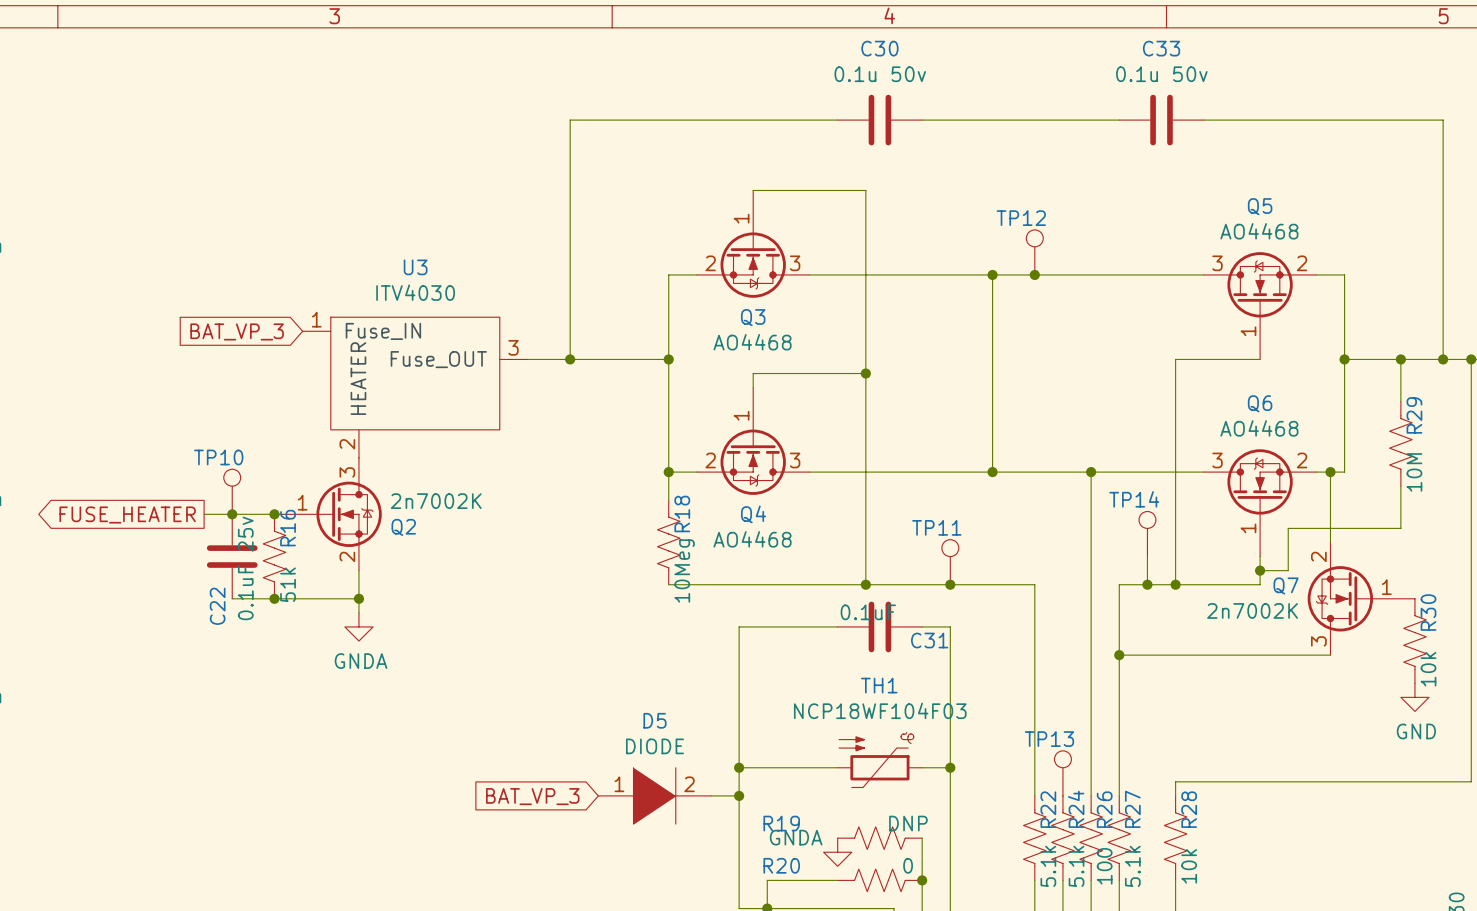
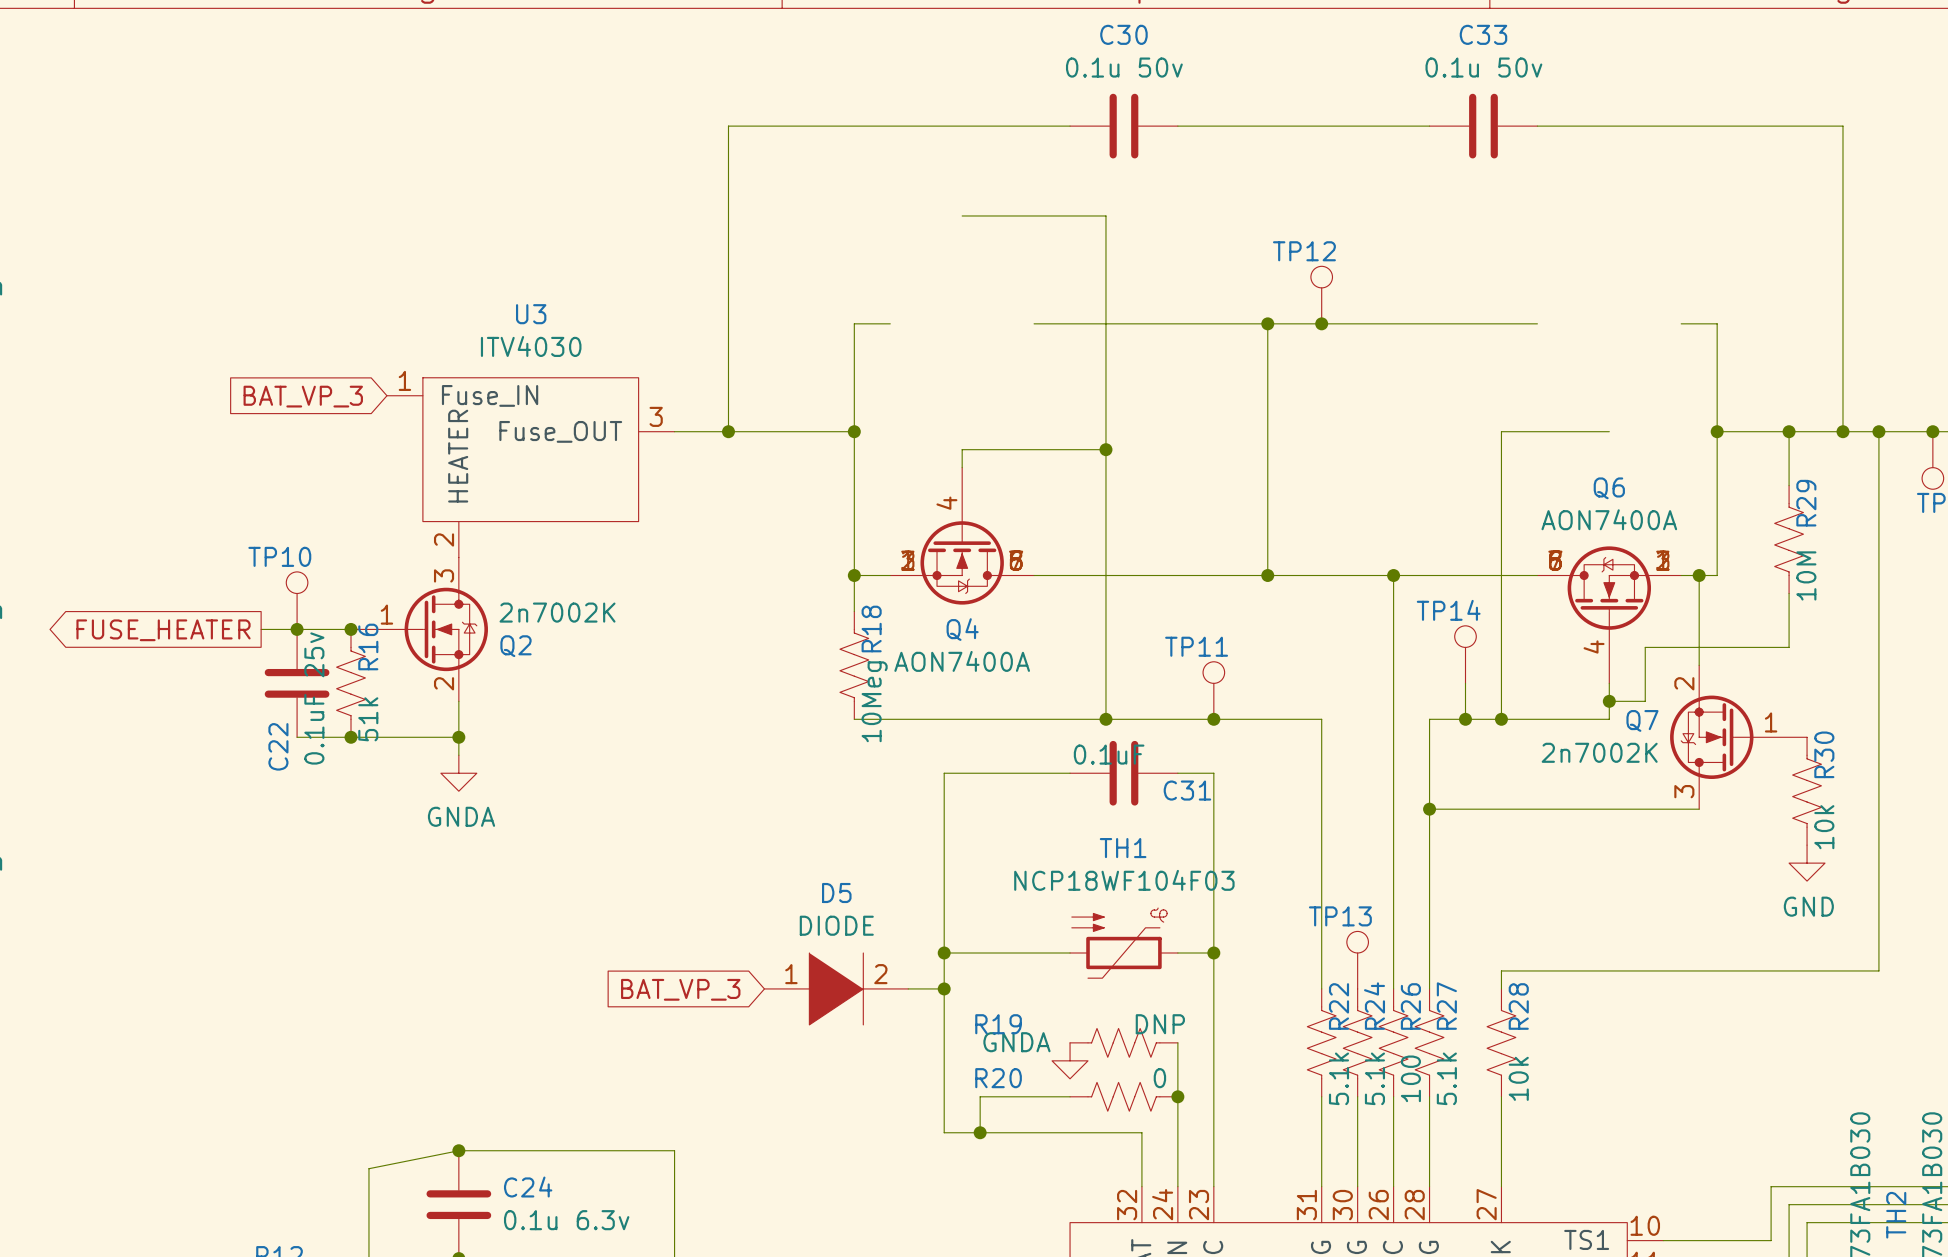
Q3: AO4468 (753, 244) -> none
Q5: AO4468 (1260, 305) -> none
Q4 symbol: [696, 387, 810, 495] -> [890, 467, 1035, 605]
Q6 value: AO4468 (1259, 428) -> AON7400A (1609, 519)
Q6 symbol: [1203, 449, 1317, 557] -> [1537, 546, 1682, 684]
Q4 value: AO4468 (752, 539) -> AON7400A (962, 661)

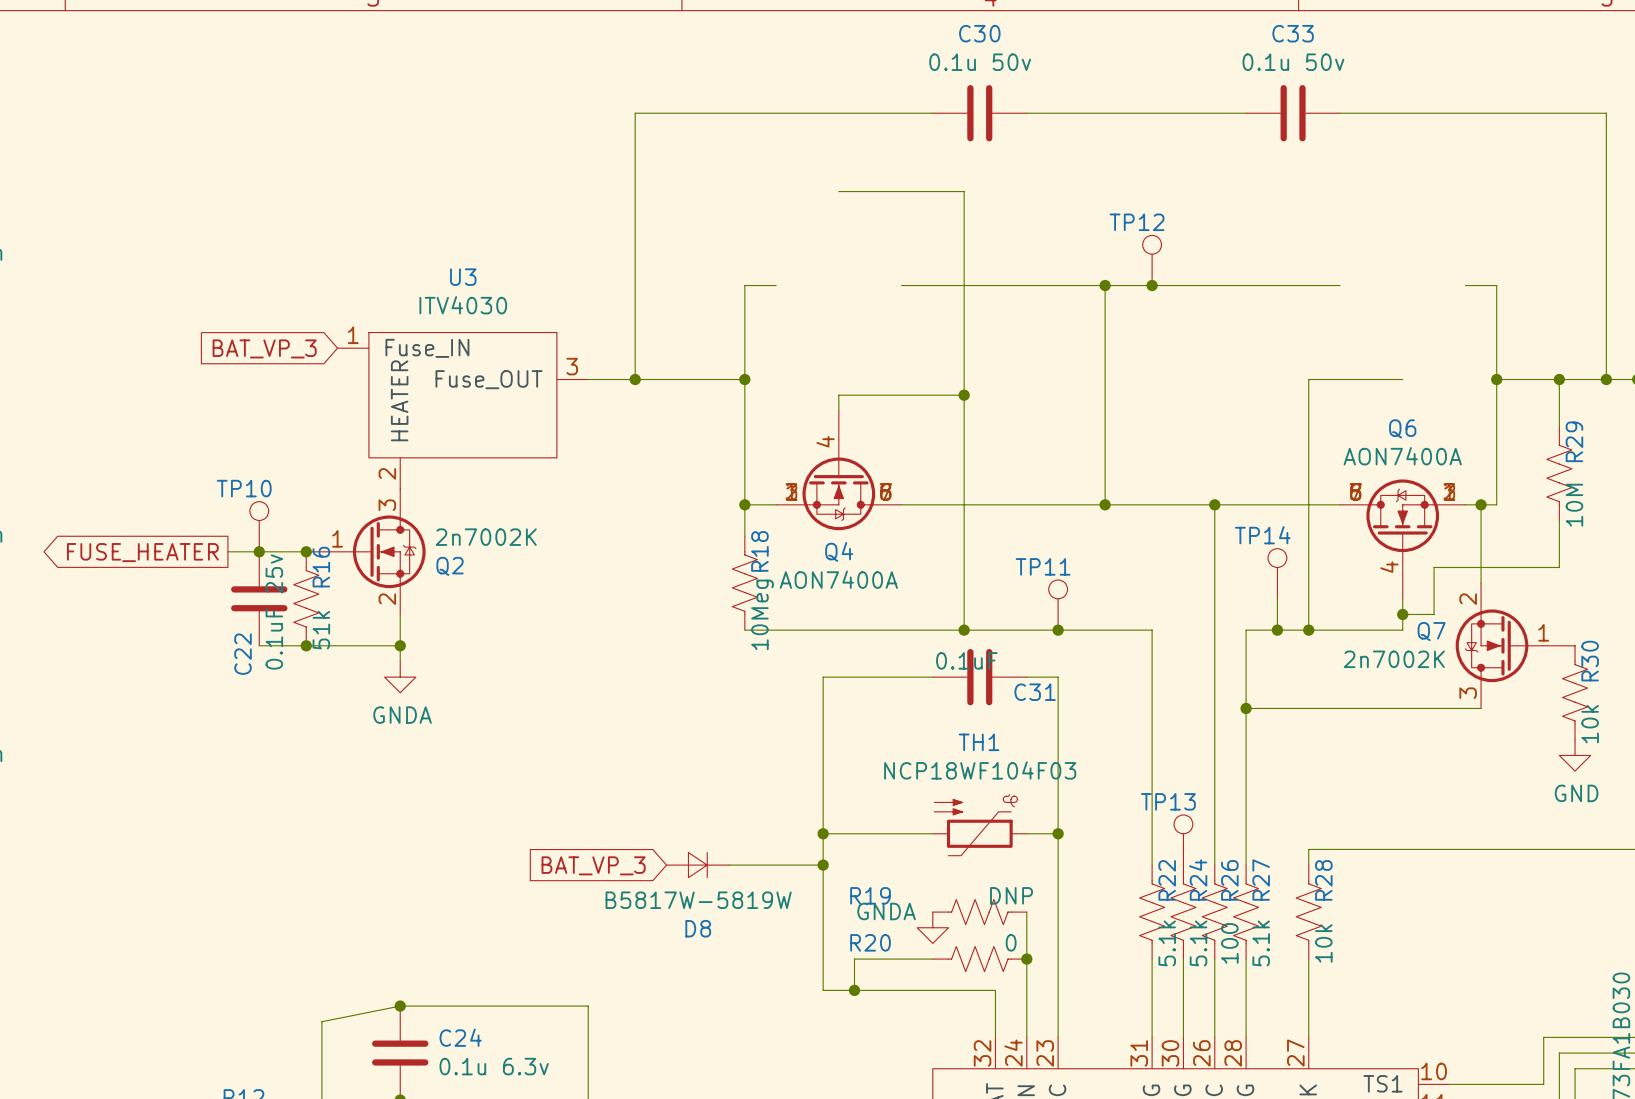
D8: none -> B5817W-5819W (697, 865)
D5: DIODE (836, 988) -> none

